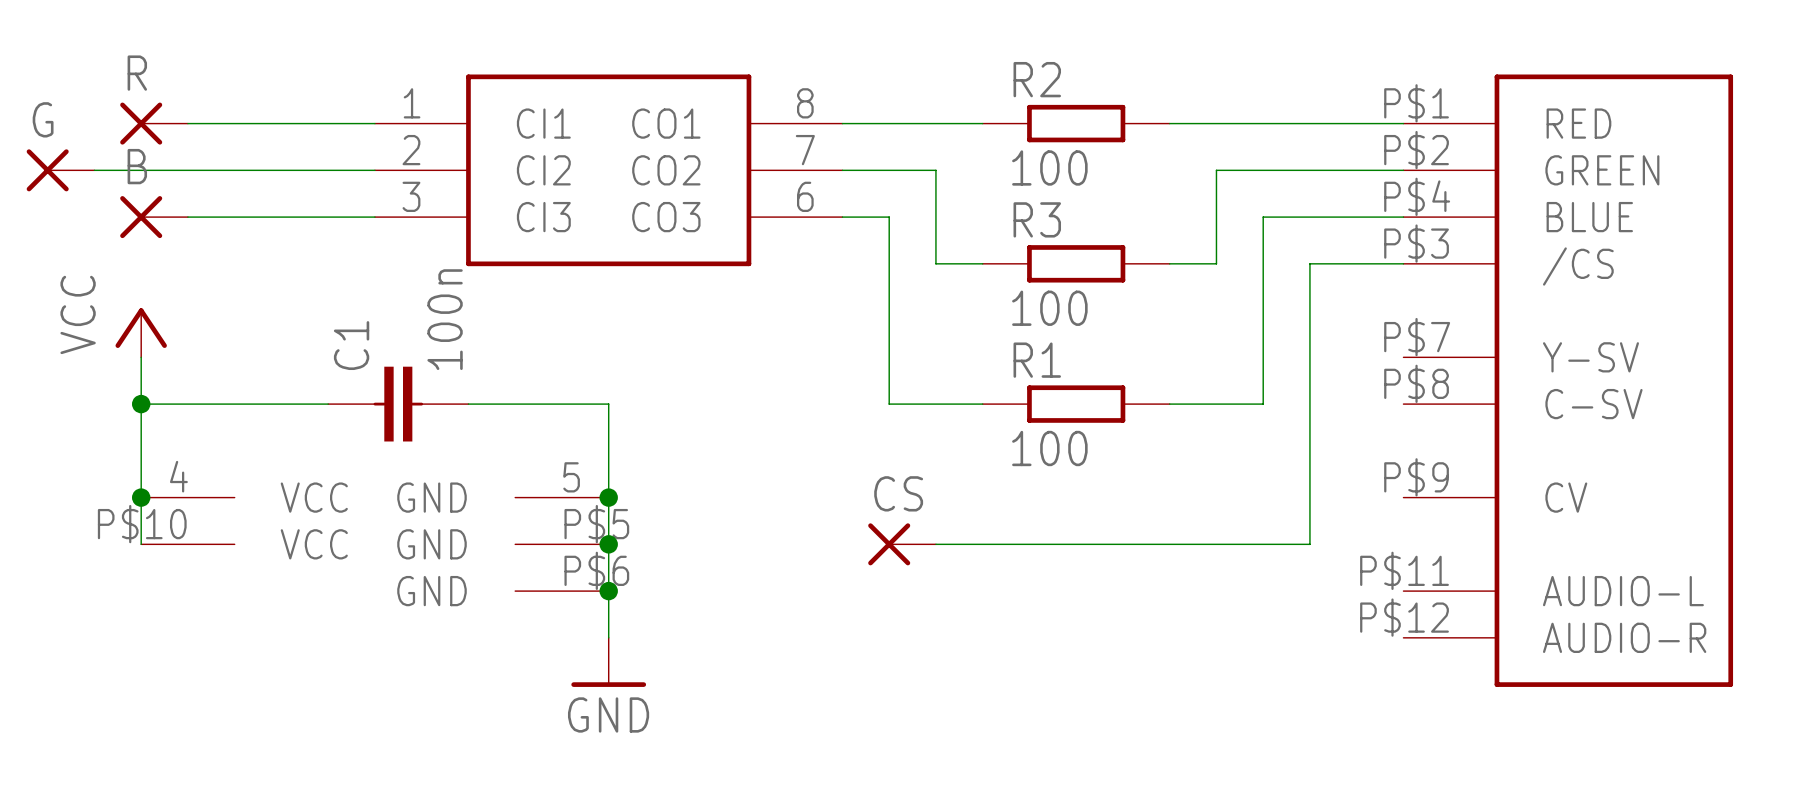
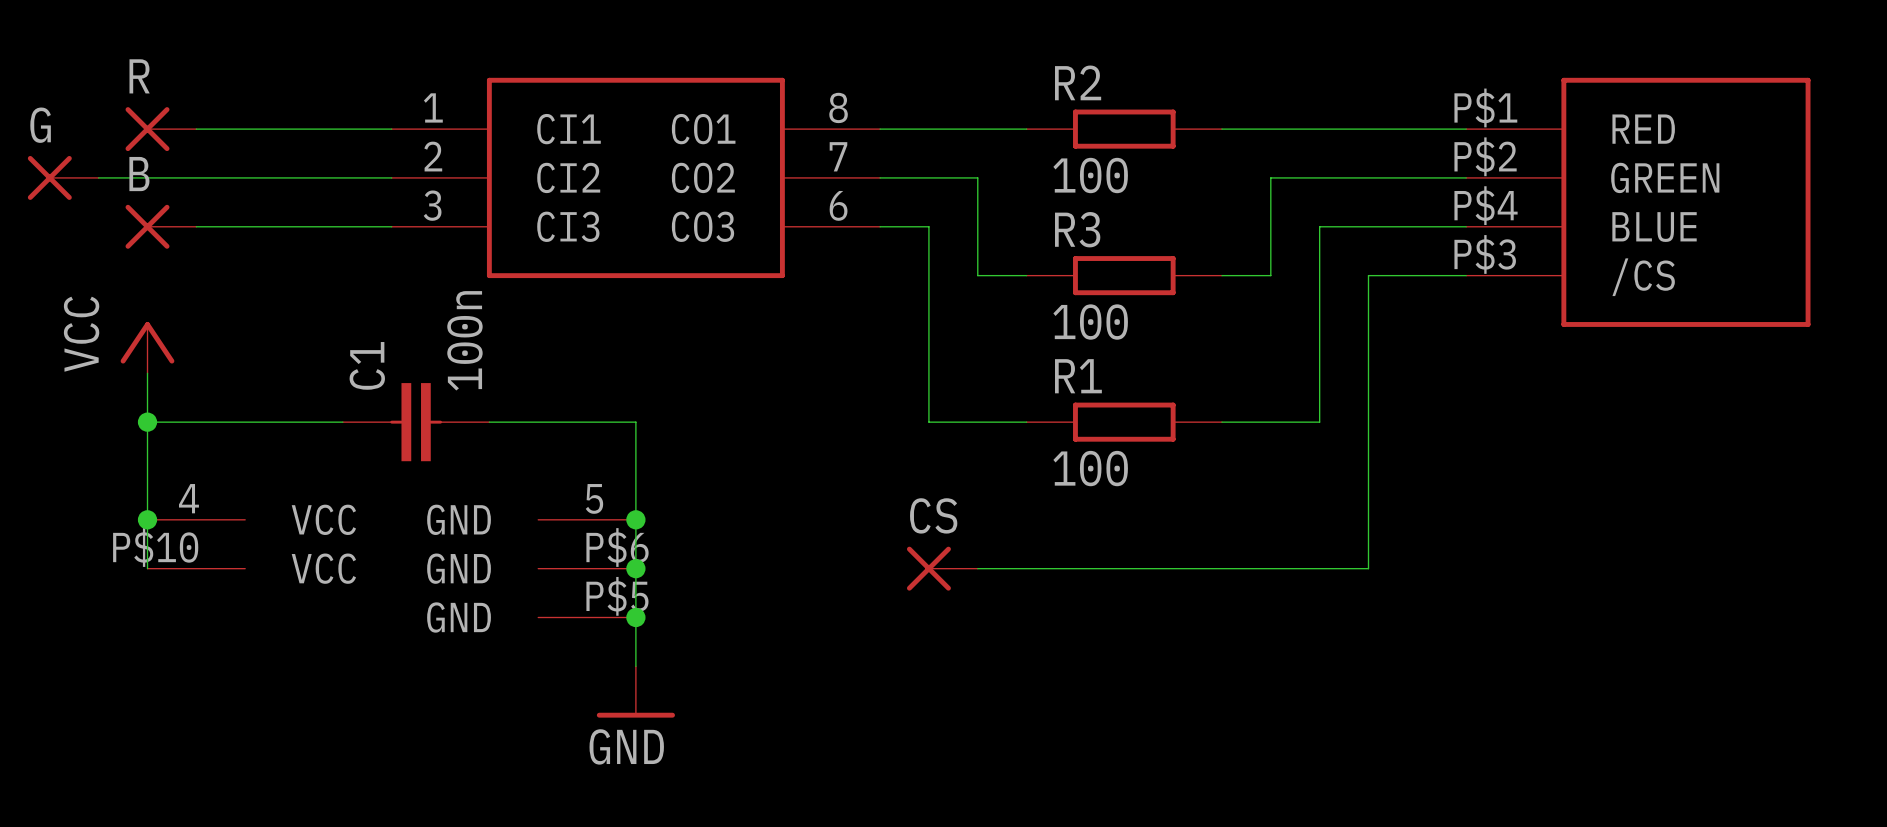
part: none -> (1638, 202)
part: (1568, 380) -> none
part pin number: P$5 (596, 524) -> P$6 (617, 547)
part pin number: P$6 (596, 570) -> P$5 (617, 596)

